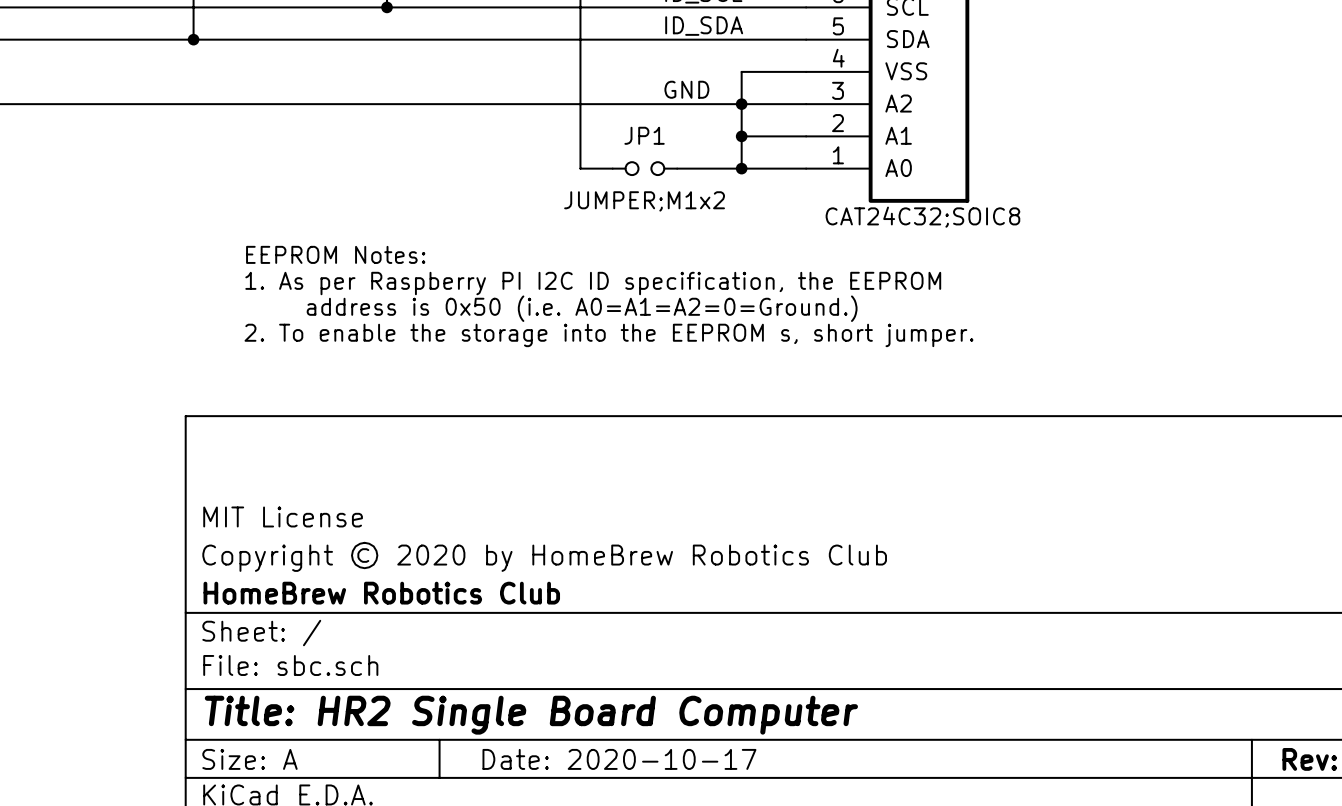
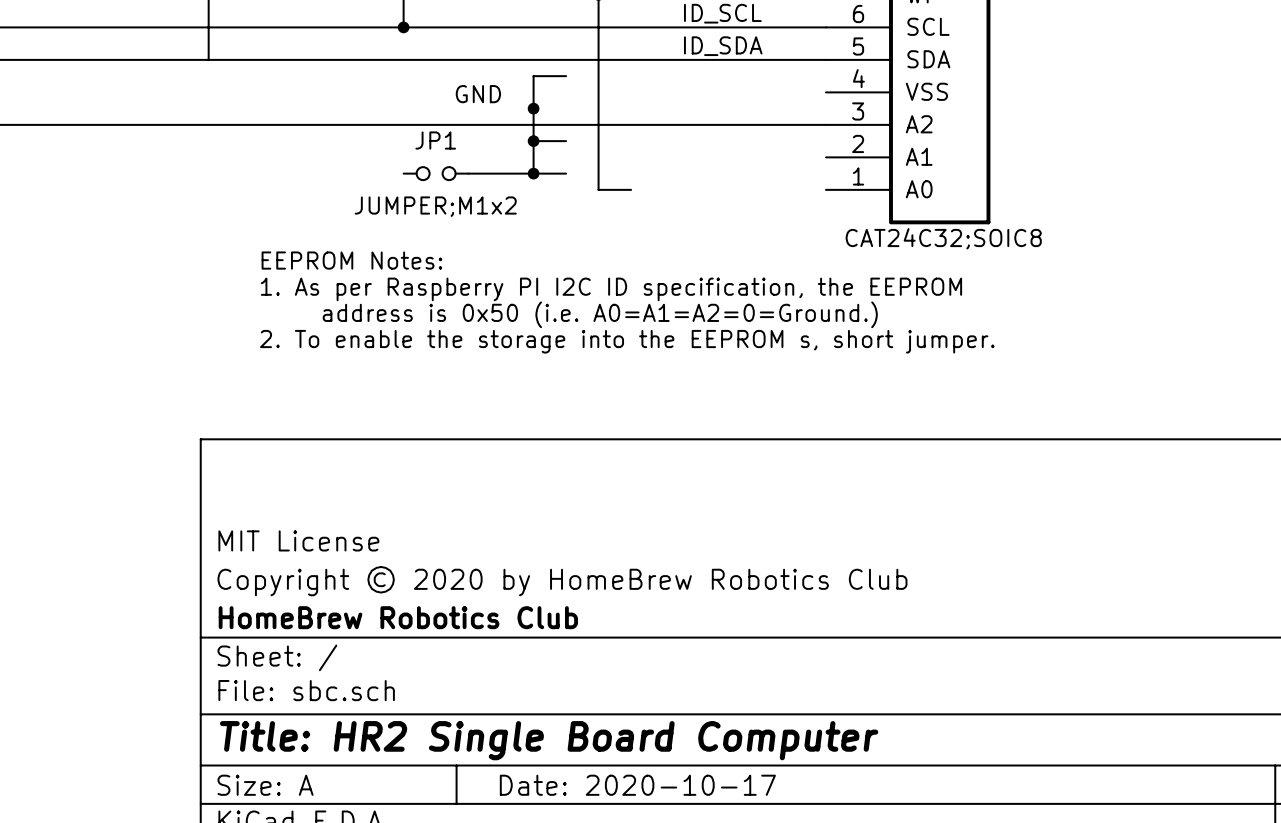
junction: (193, 39) -> none
wire: none -> (566, 76) (533, 76) (533, 173)
wire: (806, 71) (741, 71) (741, 168) -> none
junction: none -> (533, 108)
label position: GND (686, 89) -> GND (478, 94)
junction: (741, 104) -> none
wire: none -> (533, 141) (566, 141)
junction: none -> (533, 141)
wire: (741, 136) (806, 136) -> none
junction: (741, 136) -> none
wire: none -> (468, 173) (566, 173)
junction: none -> (533, 173)
JP1 position: (644, 168) -> (436, 173)
wire: (677, 168) (806, 168) -> none
junction: (741, 168) -> none
text position: EEPROM Notes: (335, 254) -> EEPROM Notes: (351, 260)
text position: 1. As per Raspberry PI I2C ID specification, the EEPROM (593, 283) -> 1. As per Raspberry PI I2C ID specification, the EEPROM (611, 289)
text position: address is 0x50 (i.e. A0=A1=A2=0=Ground.) (582, 308) -> address is 0x50 (i.e. A0=A1=A2=0=Ground.) (600, 314)
text position: 2. To enable the storage into the EEPROM s, short jumper. (608, 335) -> 2. To enable the storage into the EEPROM s, short jumper. (627, 341)

